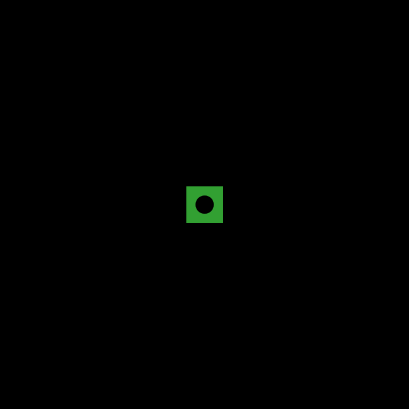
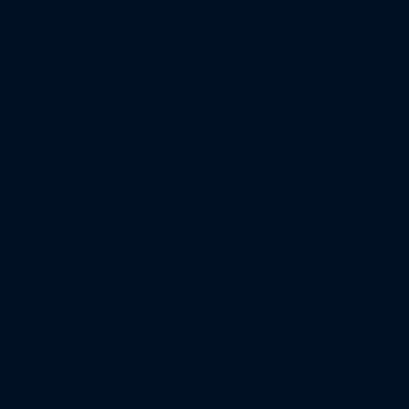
part: (204, 204) -> none

